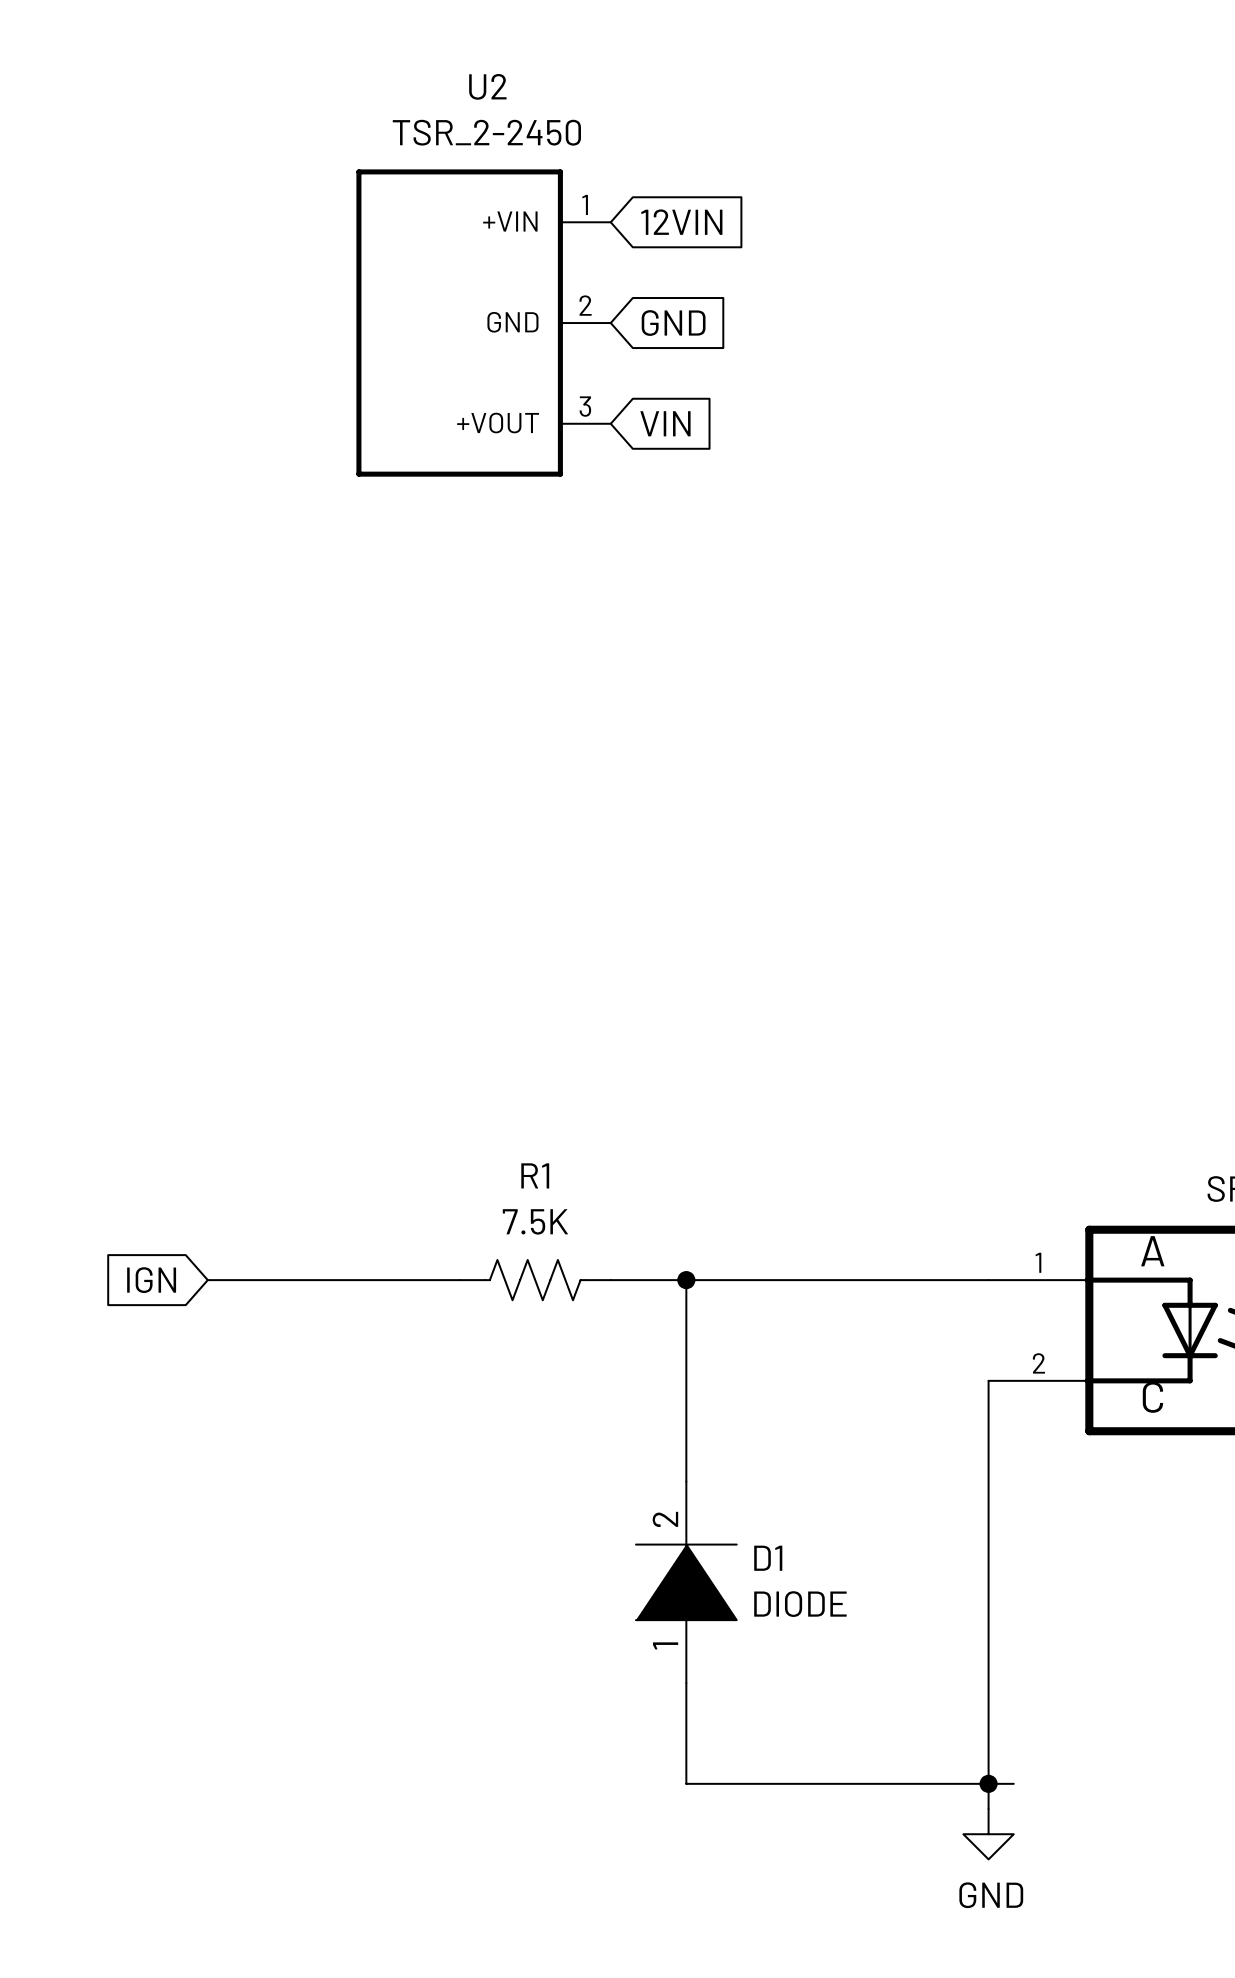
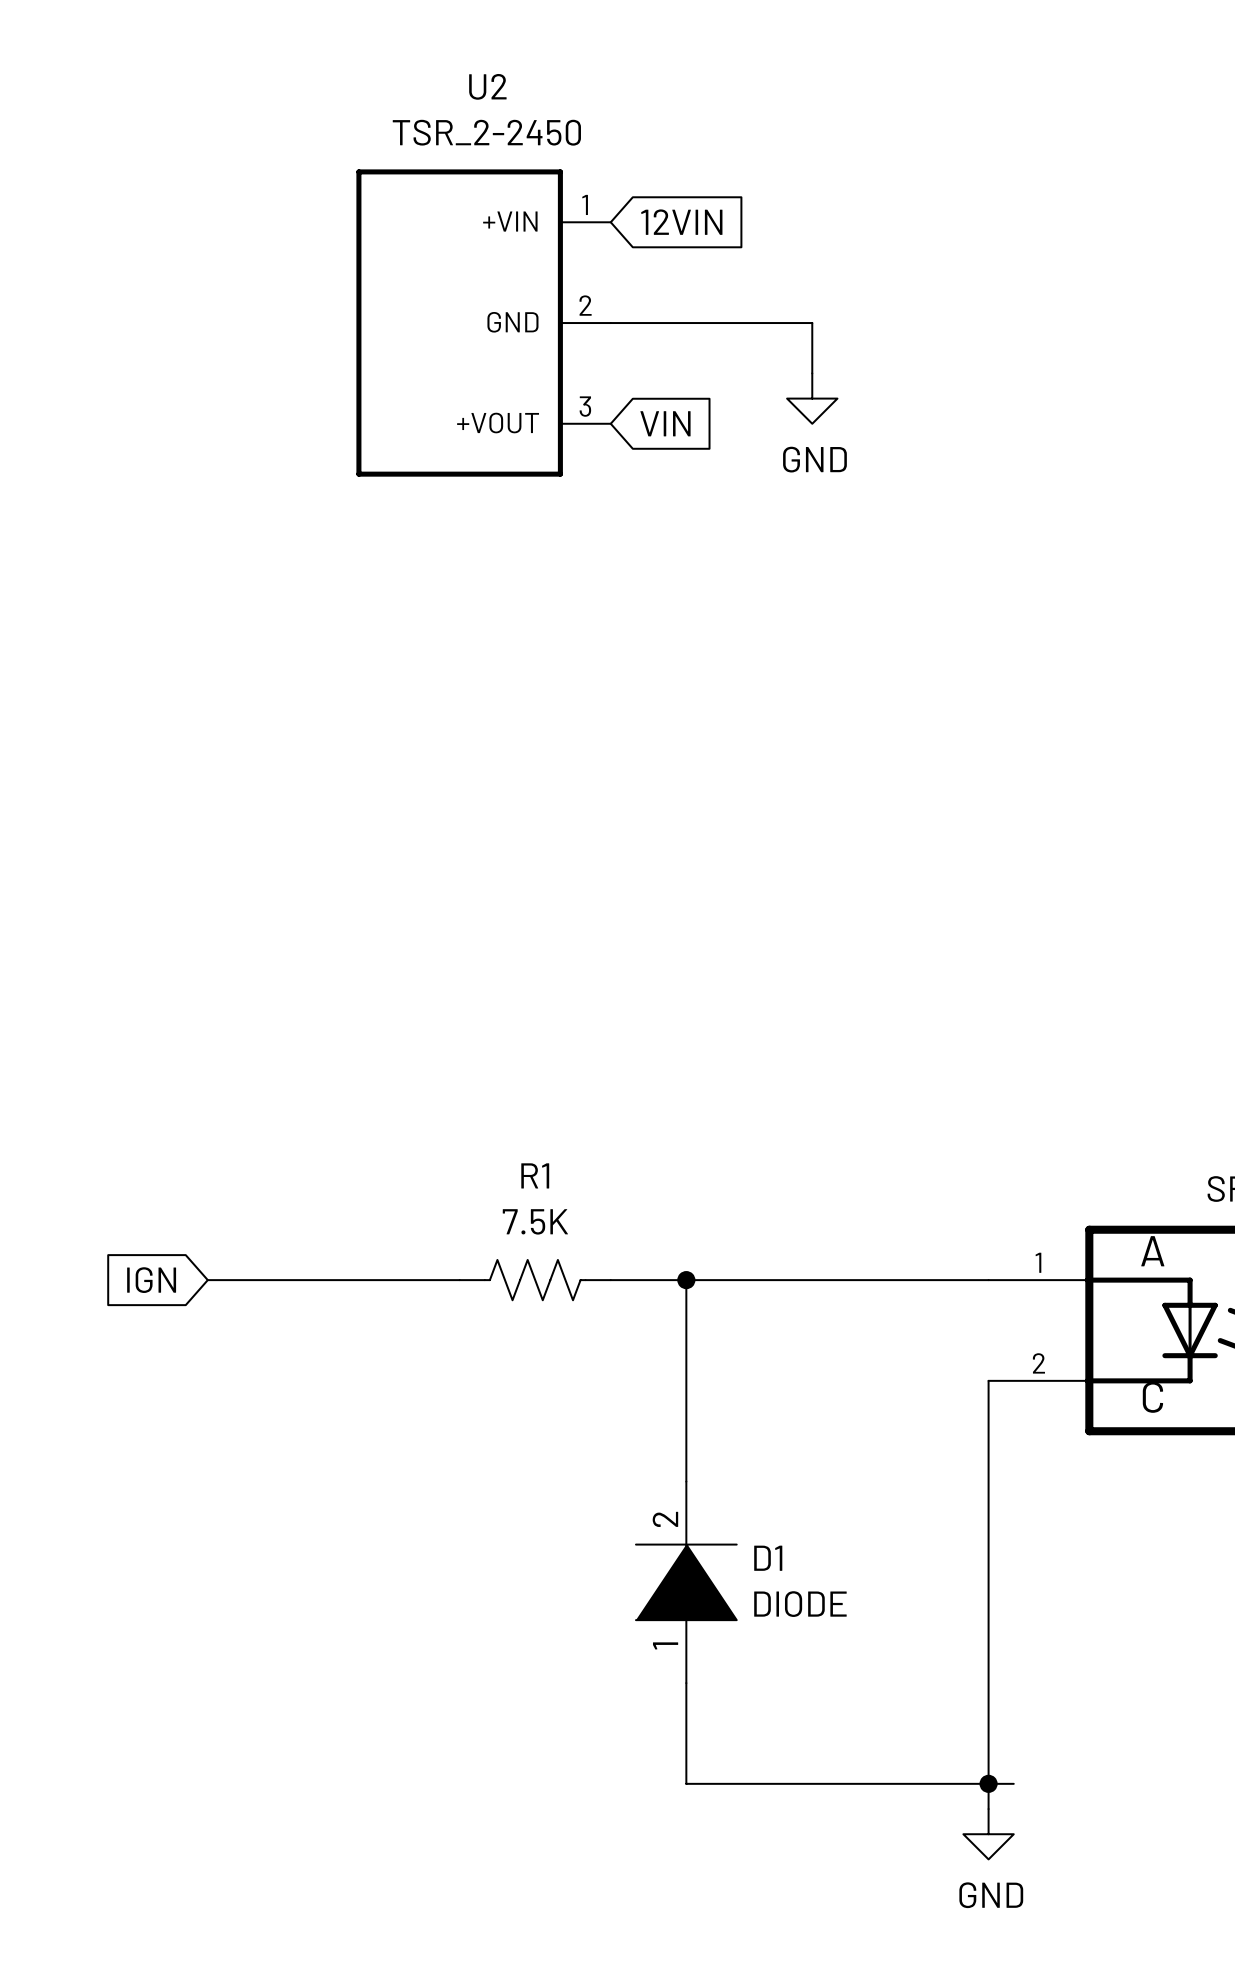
wire: none -> (610, 323) (812, 323) (812, 373)
global label: GND (673, 323) -> none
power symbol: none -> GND (812, 398)

